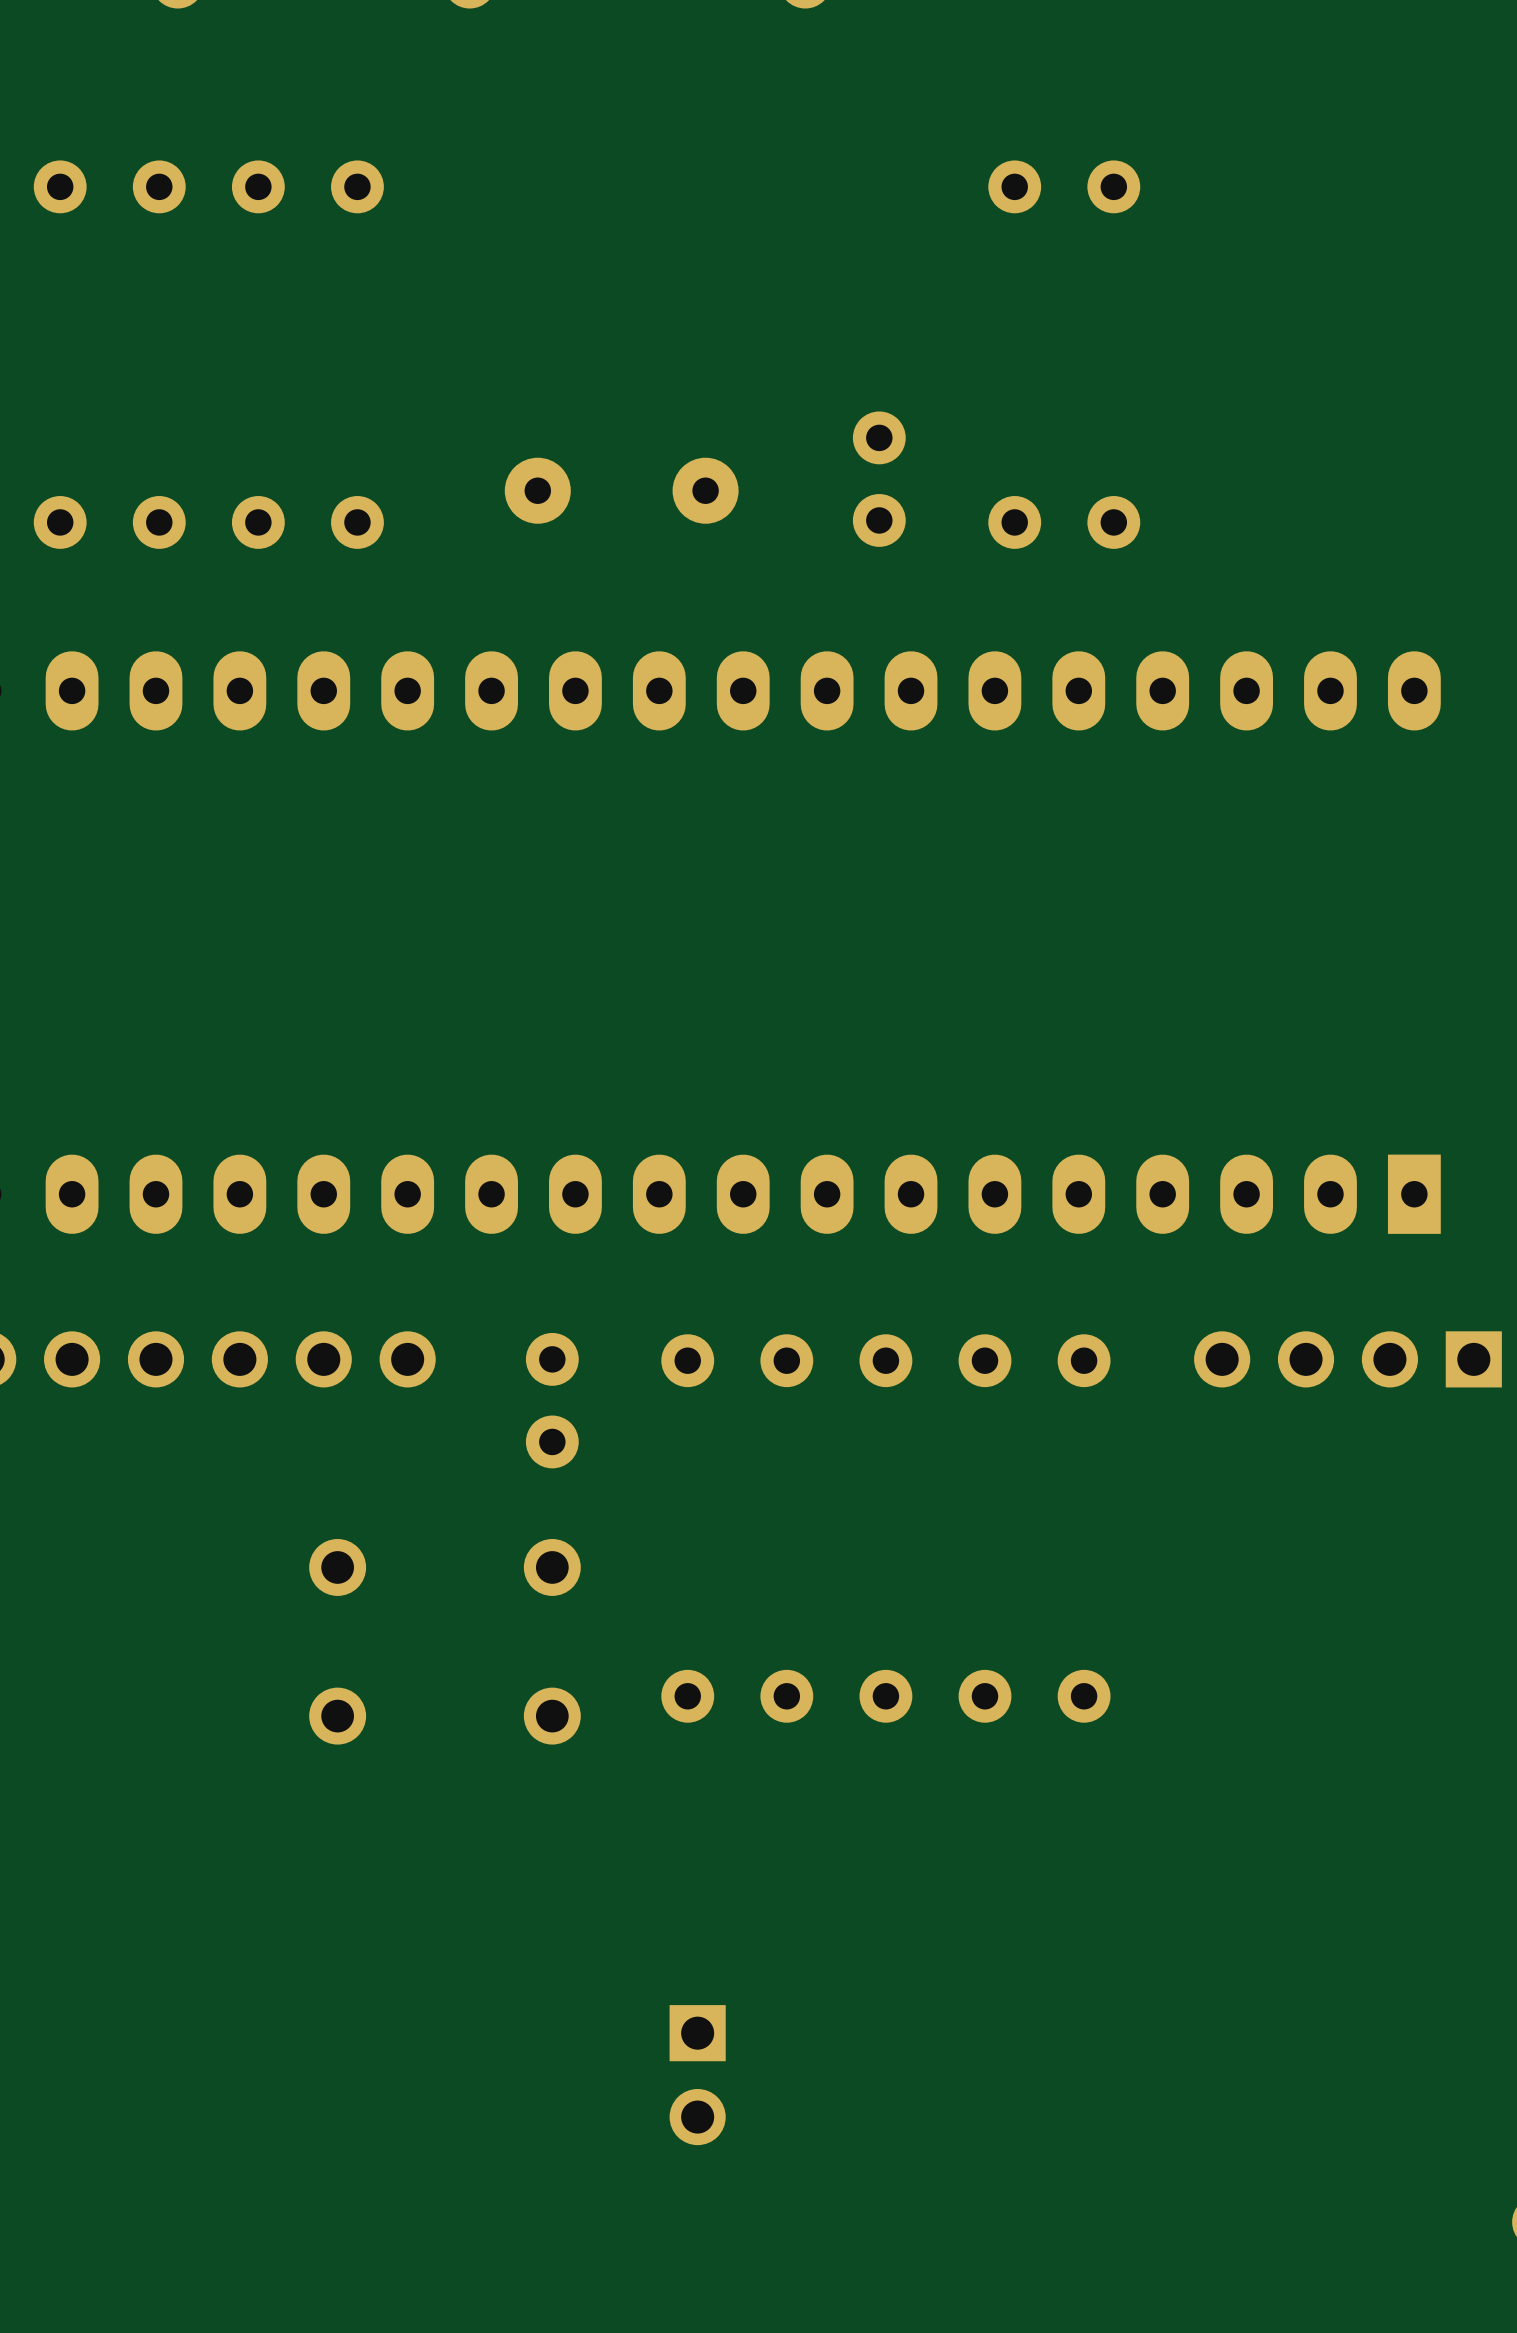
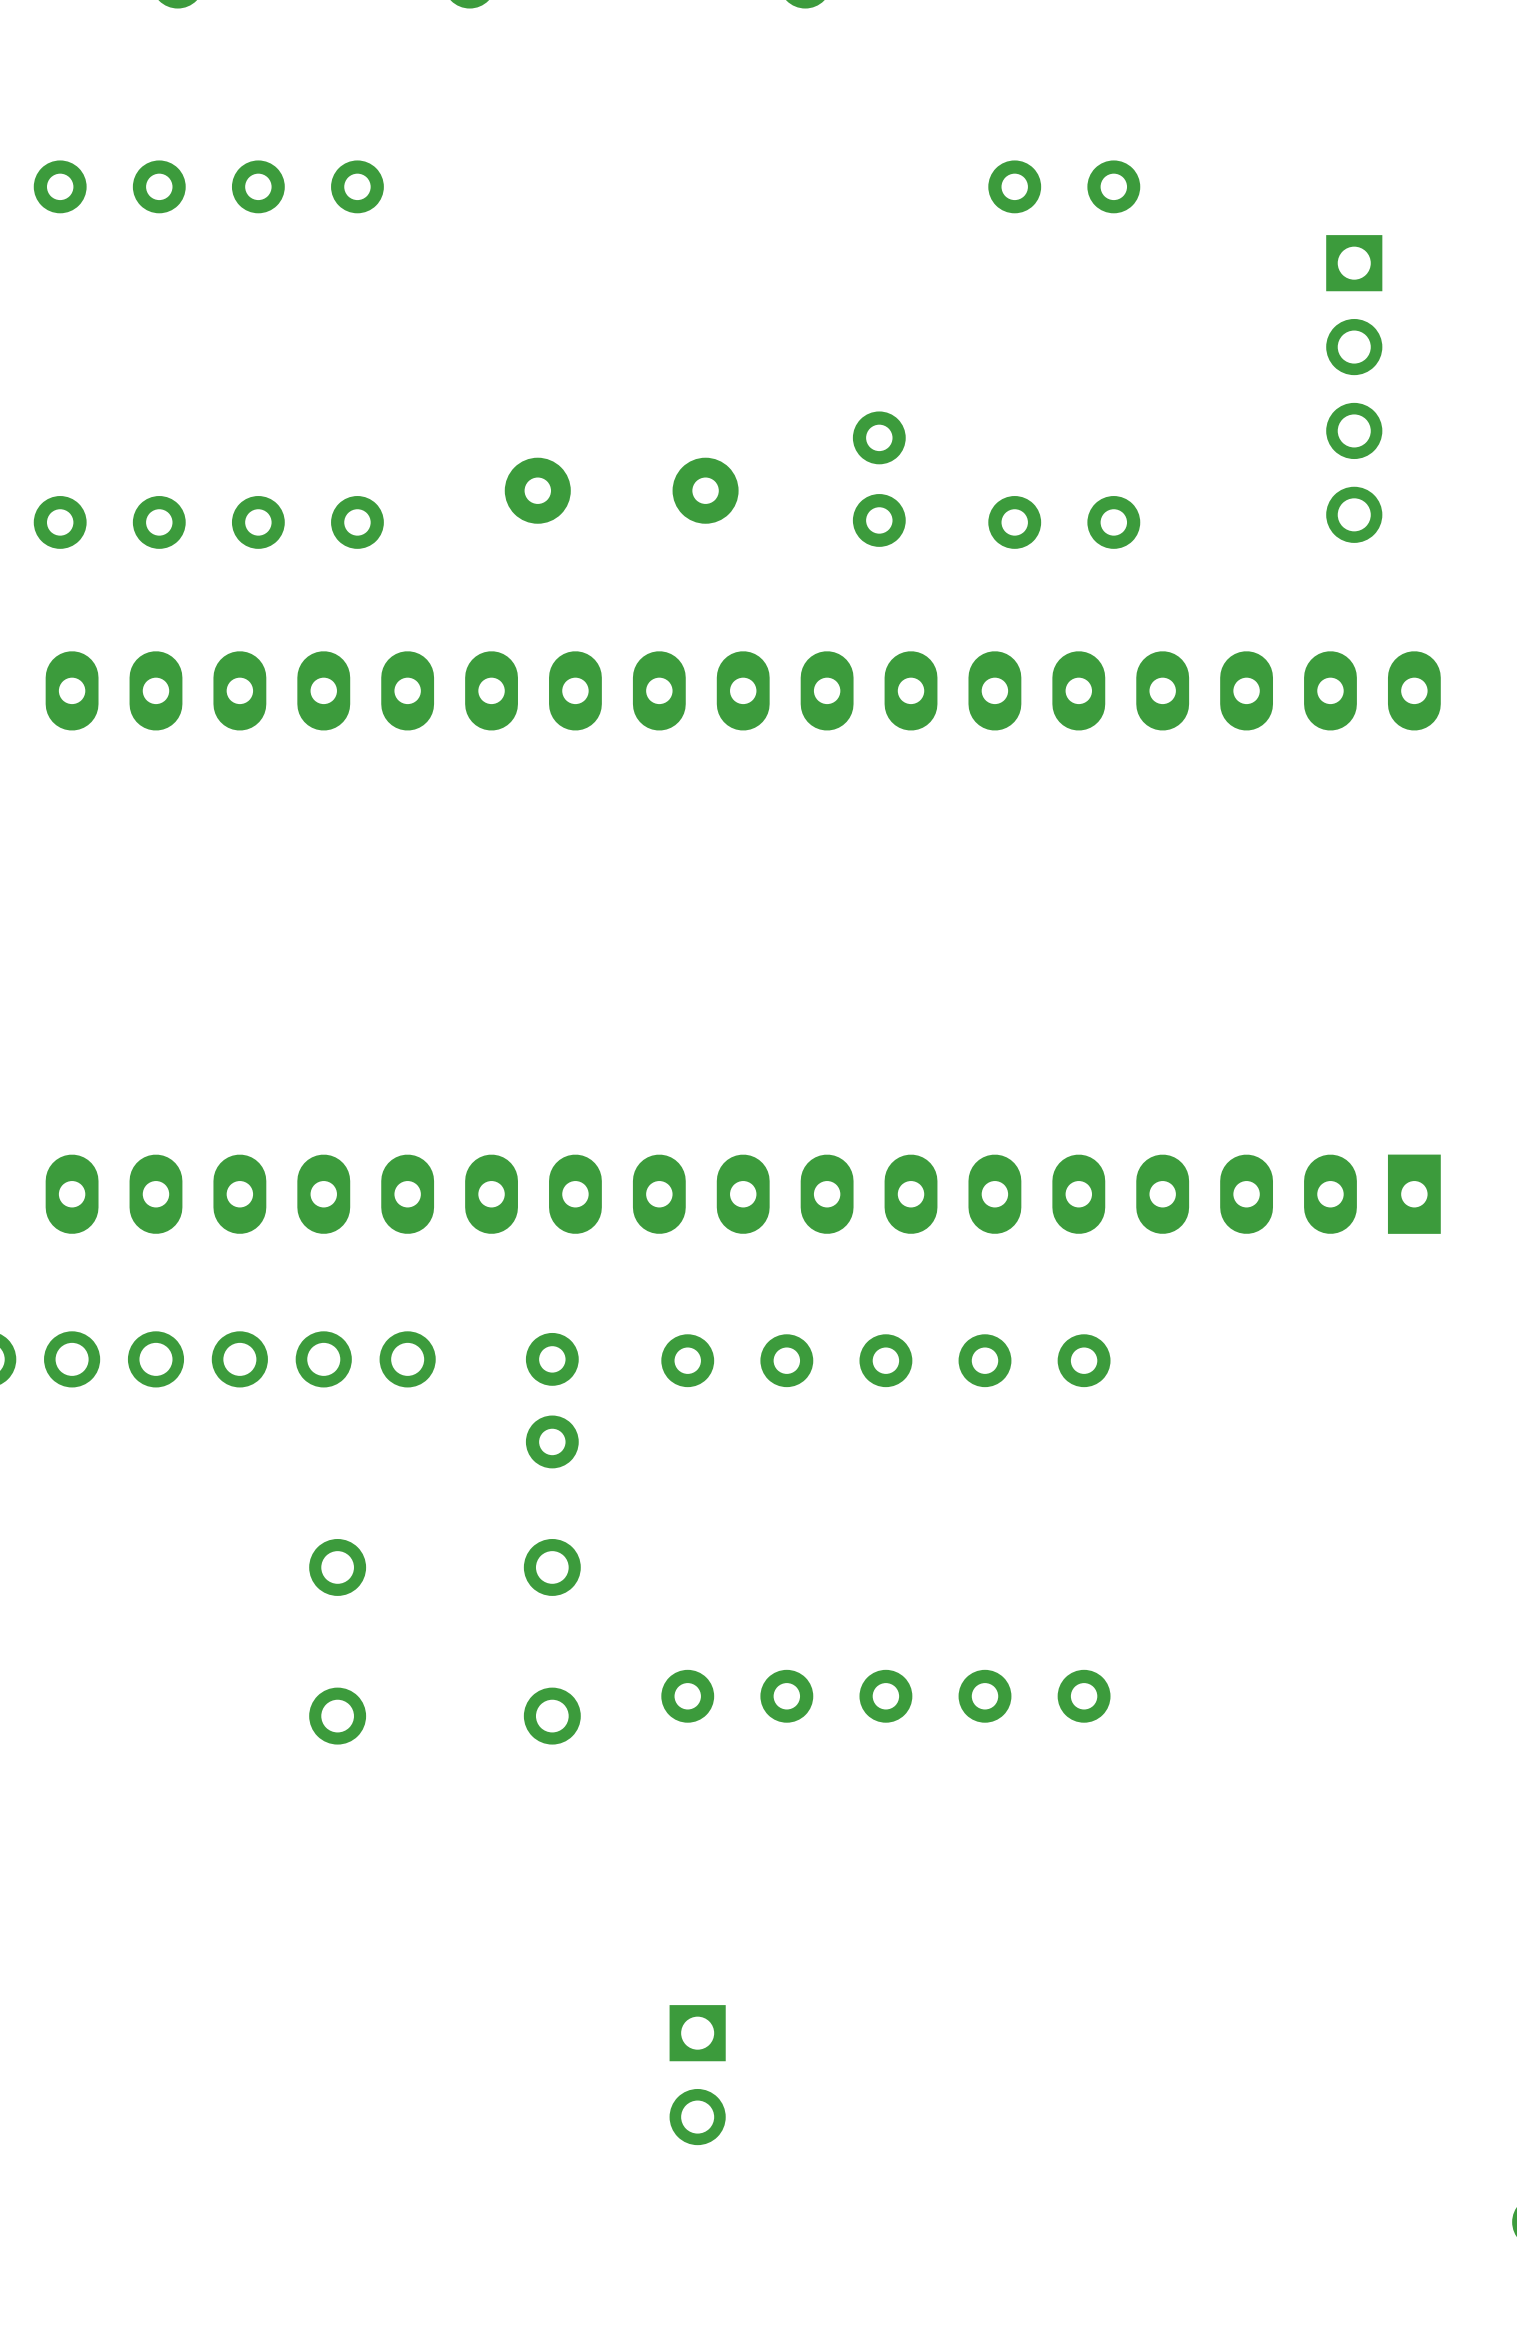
part: none -> (1354, 389)
part: (1347, 1359) -> none

